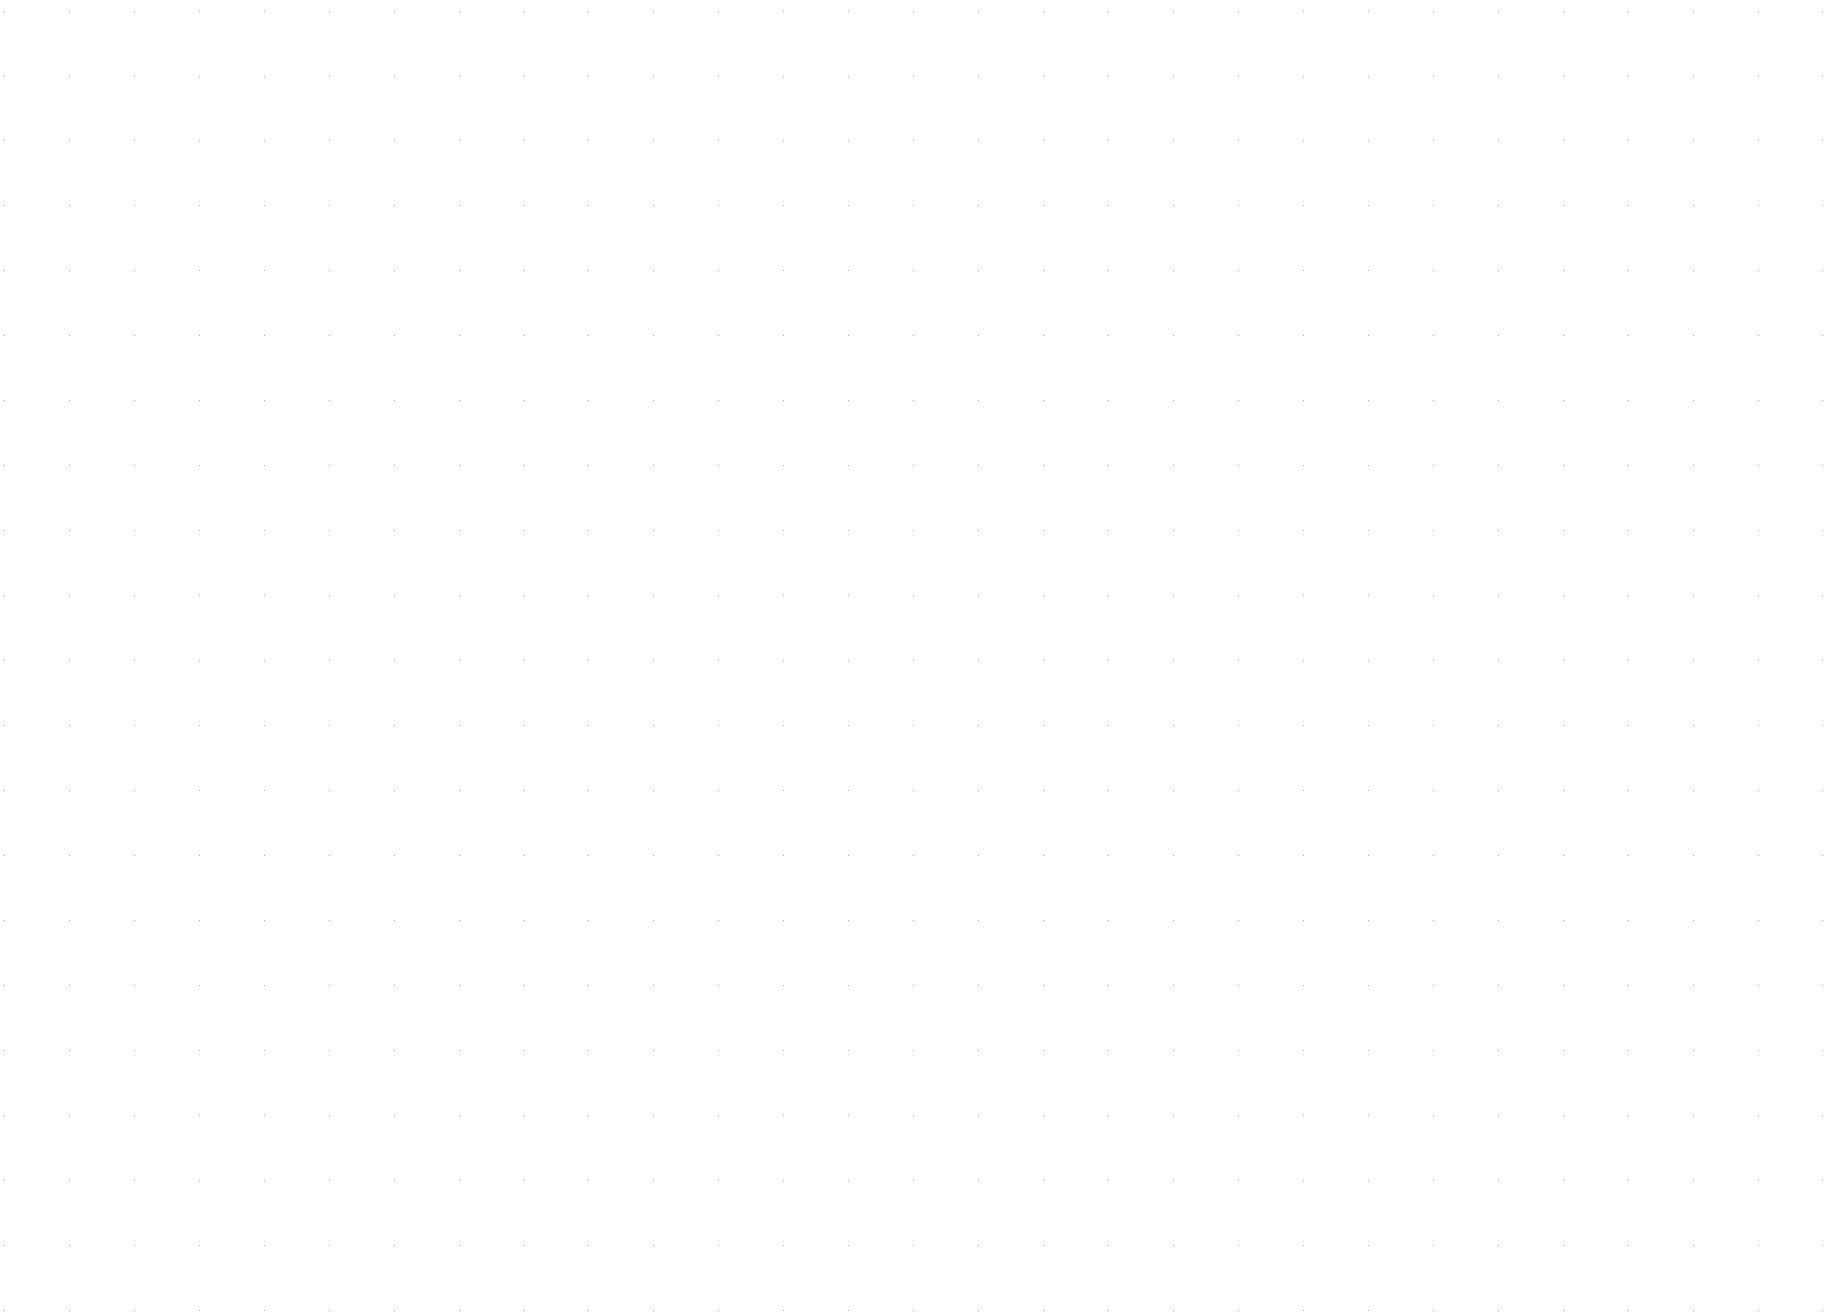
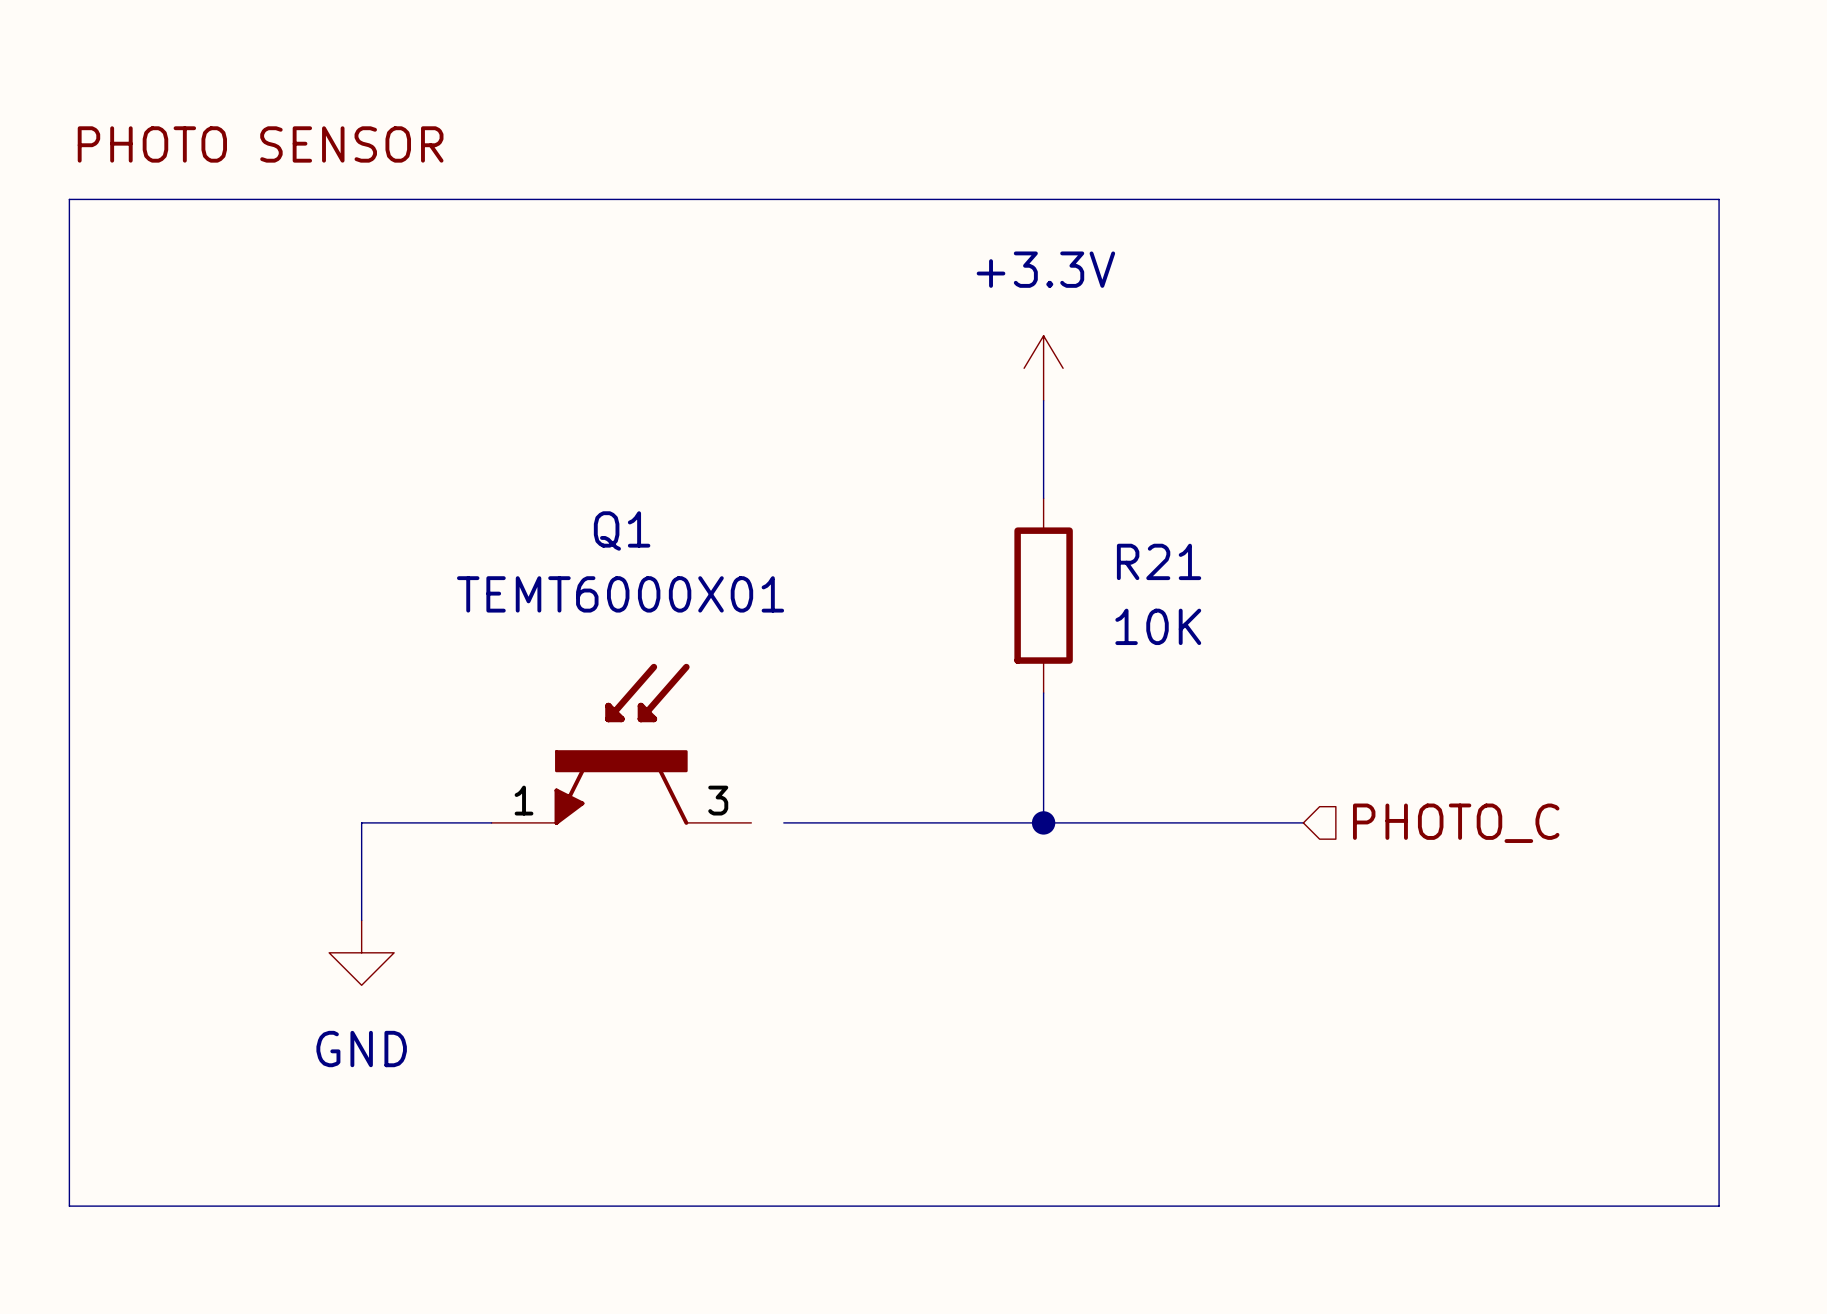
label: none -> PHOTO SENSOR (260, 144)
line: none -> (69, 199) (1719, 199) (1719, 1206) (69, 1206) (69, 199)
power symbol: none -> +3.3V (1043, 368)
wire: none -> (1043, 400) (1043, 498)
R21: none -> 10K (1043, 595)
wire: none -> (1043, 693) (1043, 822)
Q1: none -> TEMT6000X01 (621, 744)
wire: none -> (491, 822) (361, 822) (361, 920)
wire: none -> (783, 822) (1303, 822)
junction: none -> (1043, 822)
hierarchical label: none -> PHOTO_C (1456, 823)
power symbol: none -> GND (361, 952)

